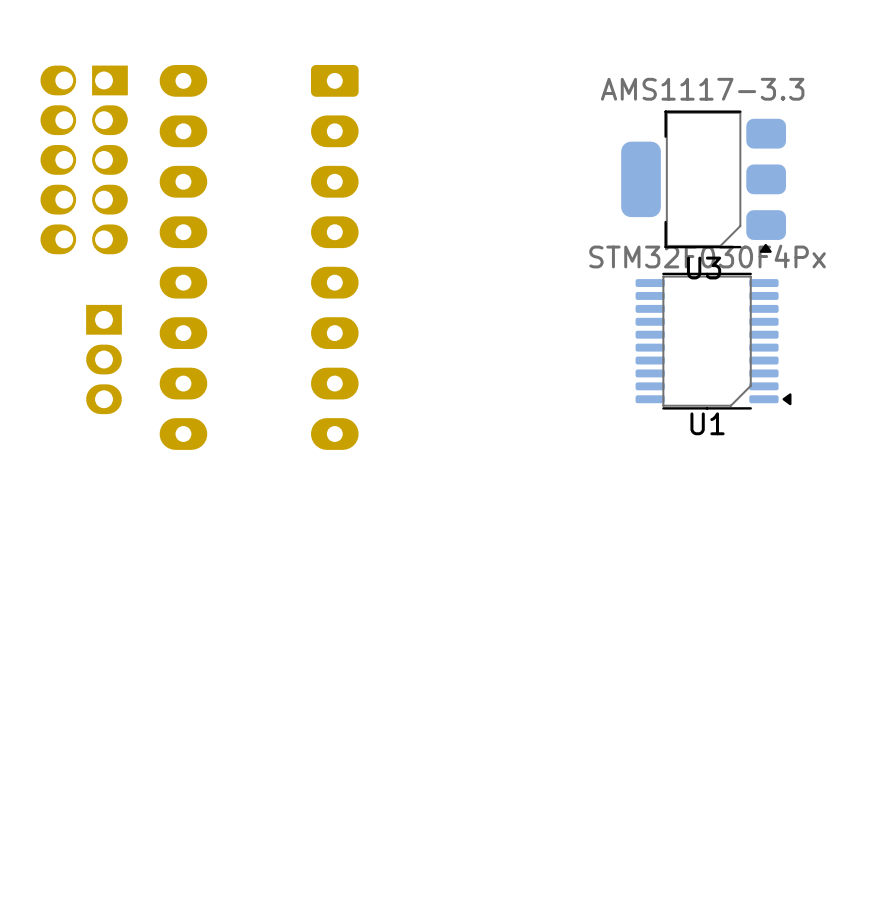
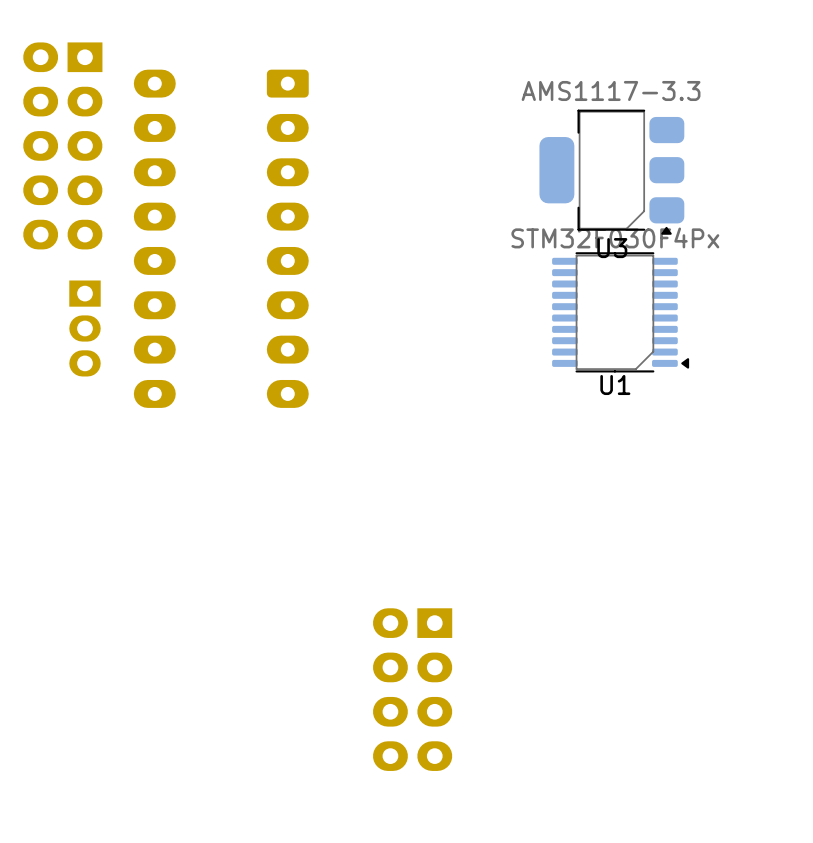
part footprint: [40, 65, 128, 255] -> [23, 42, 103, 250]
part: none -> (412, 689)

